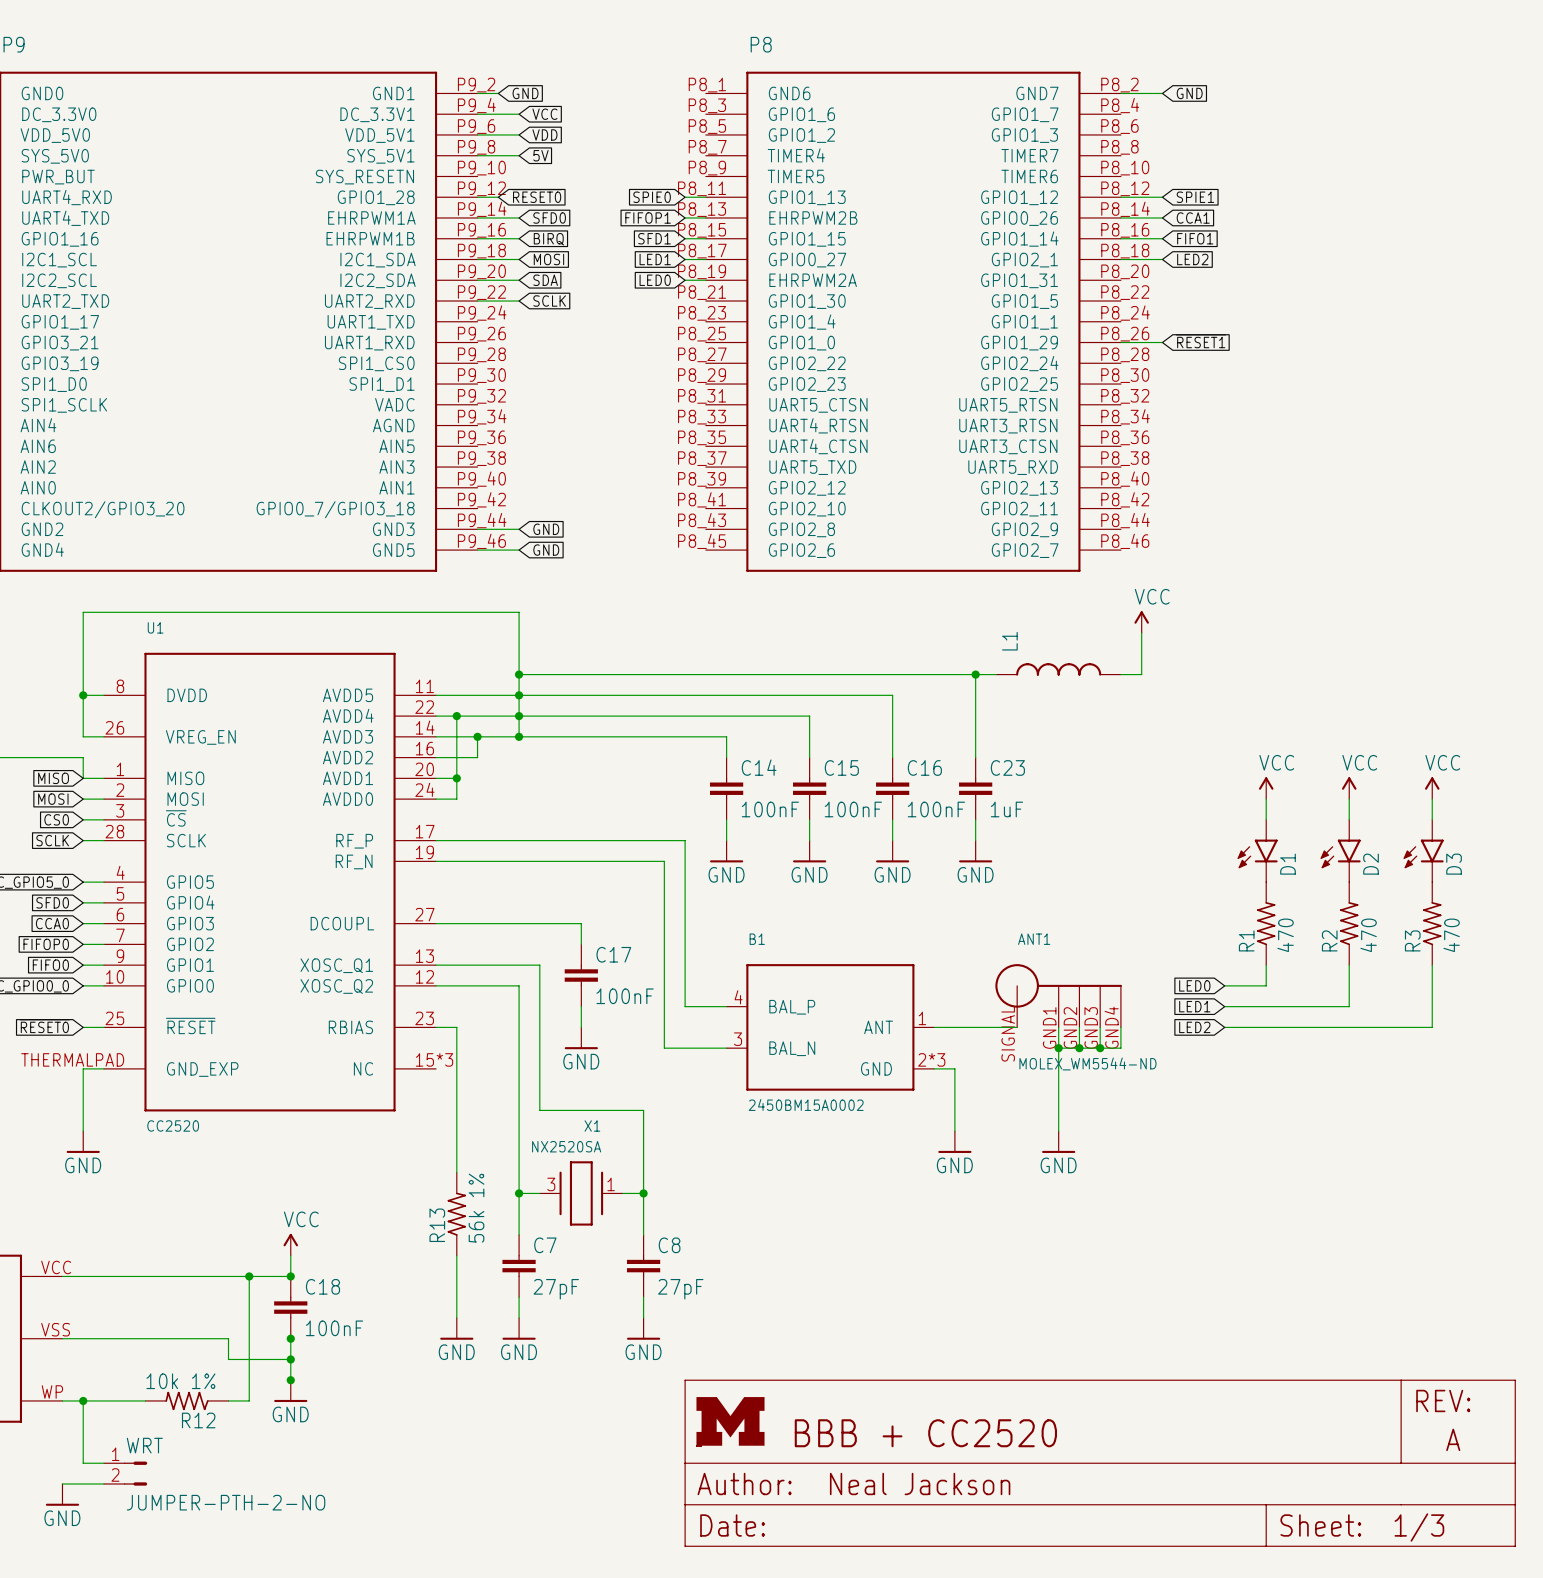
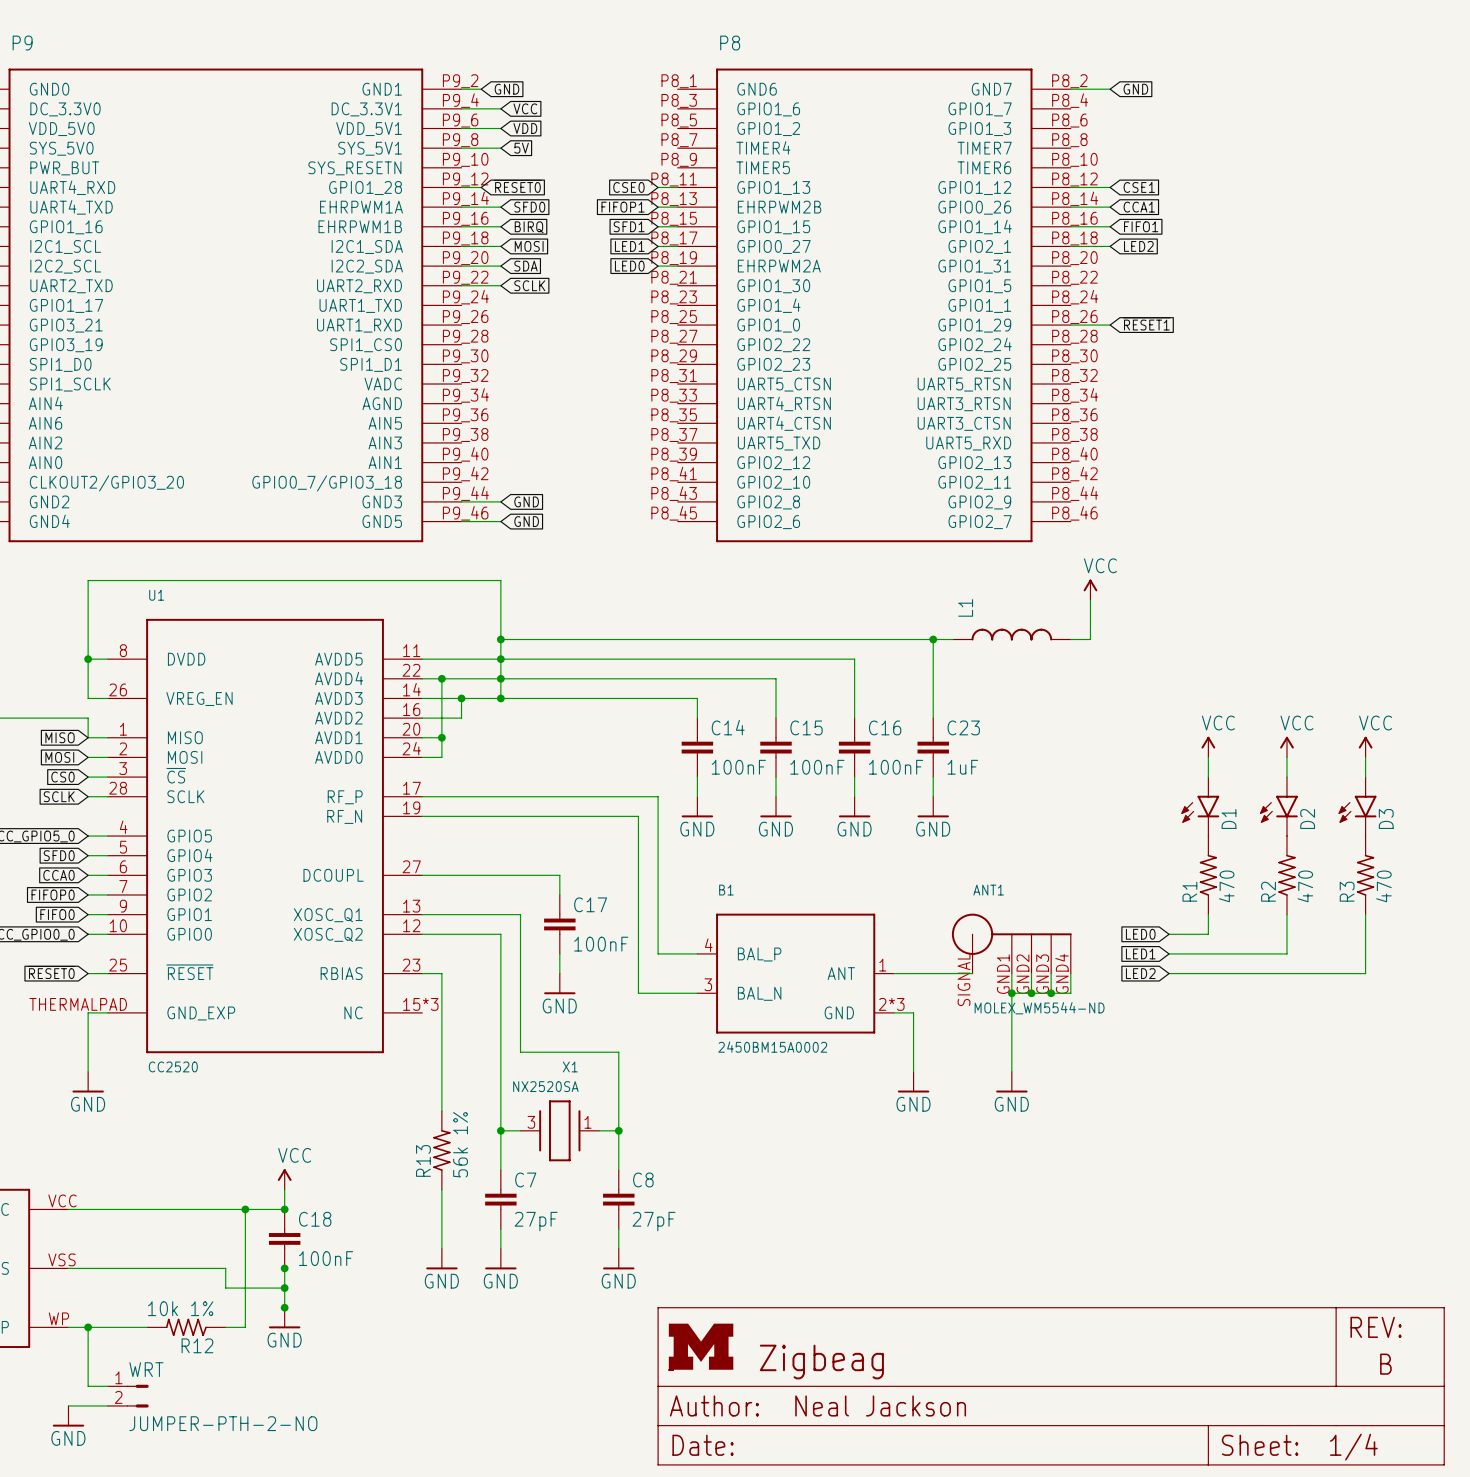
global label: SPIE0 (652, 197) -> CSE0 (628, 187)
global label: SPIE1 (1195, 197) -> CSE1 (1139, 187)
part text: BBB + CC2520 (925, 1433) -> Zigbeag (821, 1362)
part text: A (1453, 1439) -> B (1385, 1364)
part text: 1/3 (1419, 1527) -> 1/4 (1353, 1447)

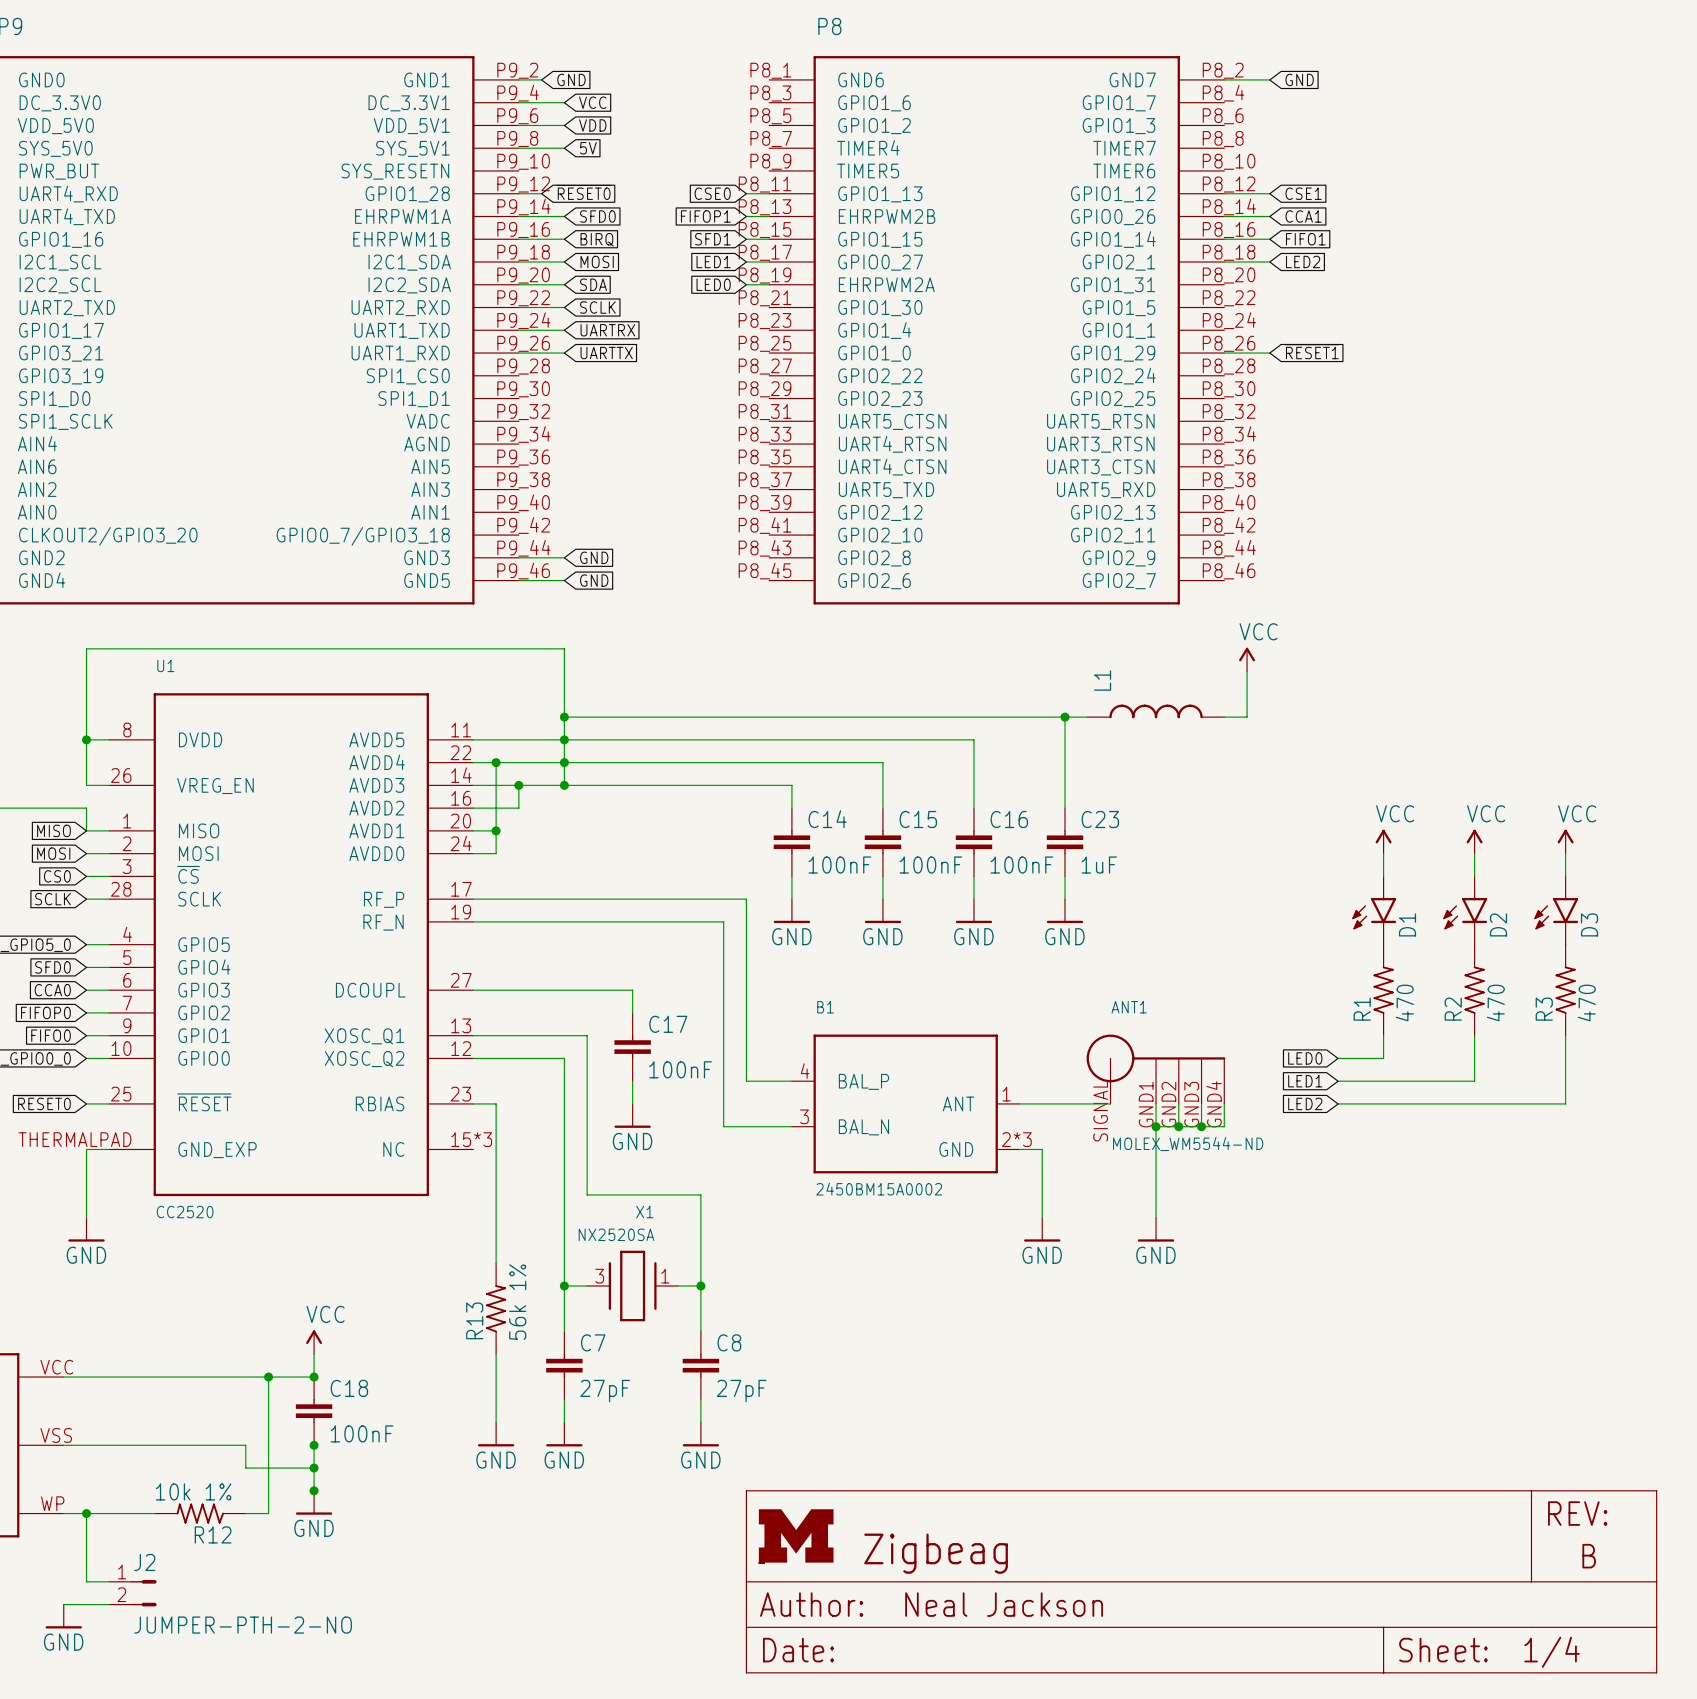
wire: none -> (518, 330) (564, 330)
global label: none -> UARTRX (607, 330)
wire: none -> (518, 353) (564, 353)
global label: none -> UARTTX (606, 353)
WRT name: WRT (146, 1369) -> J2 (144, 1562)

